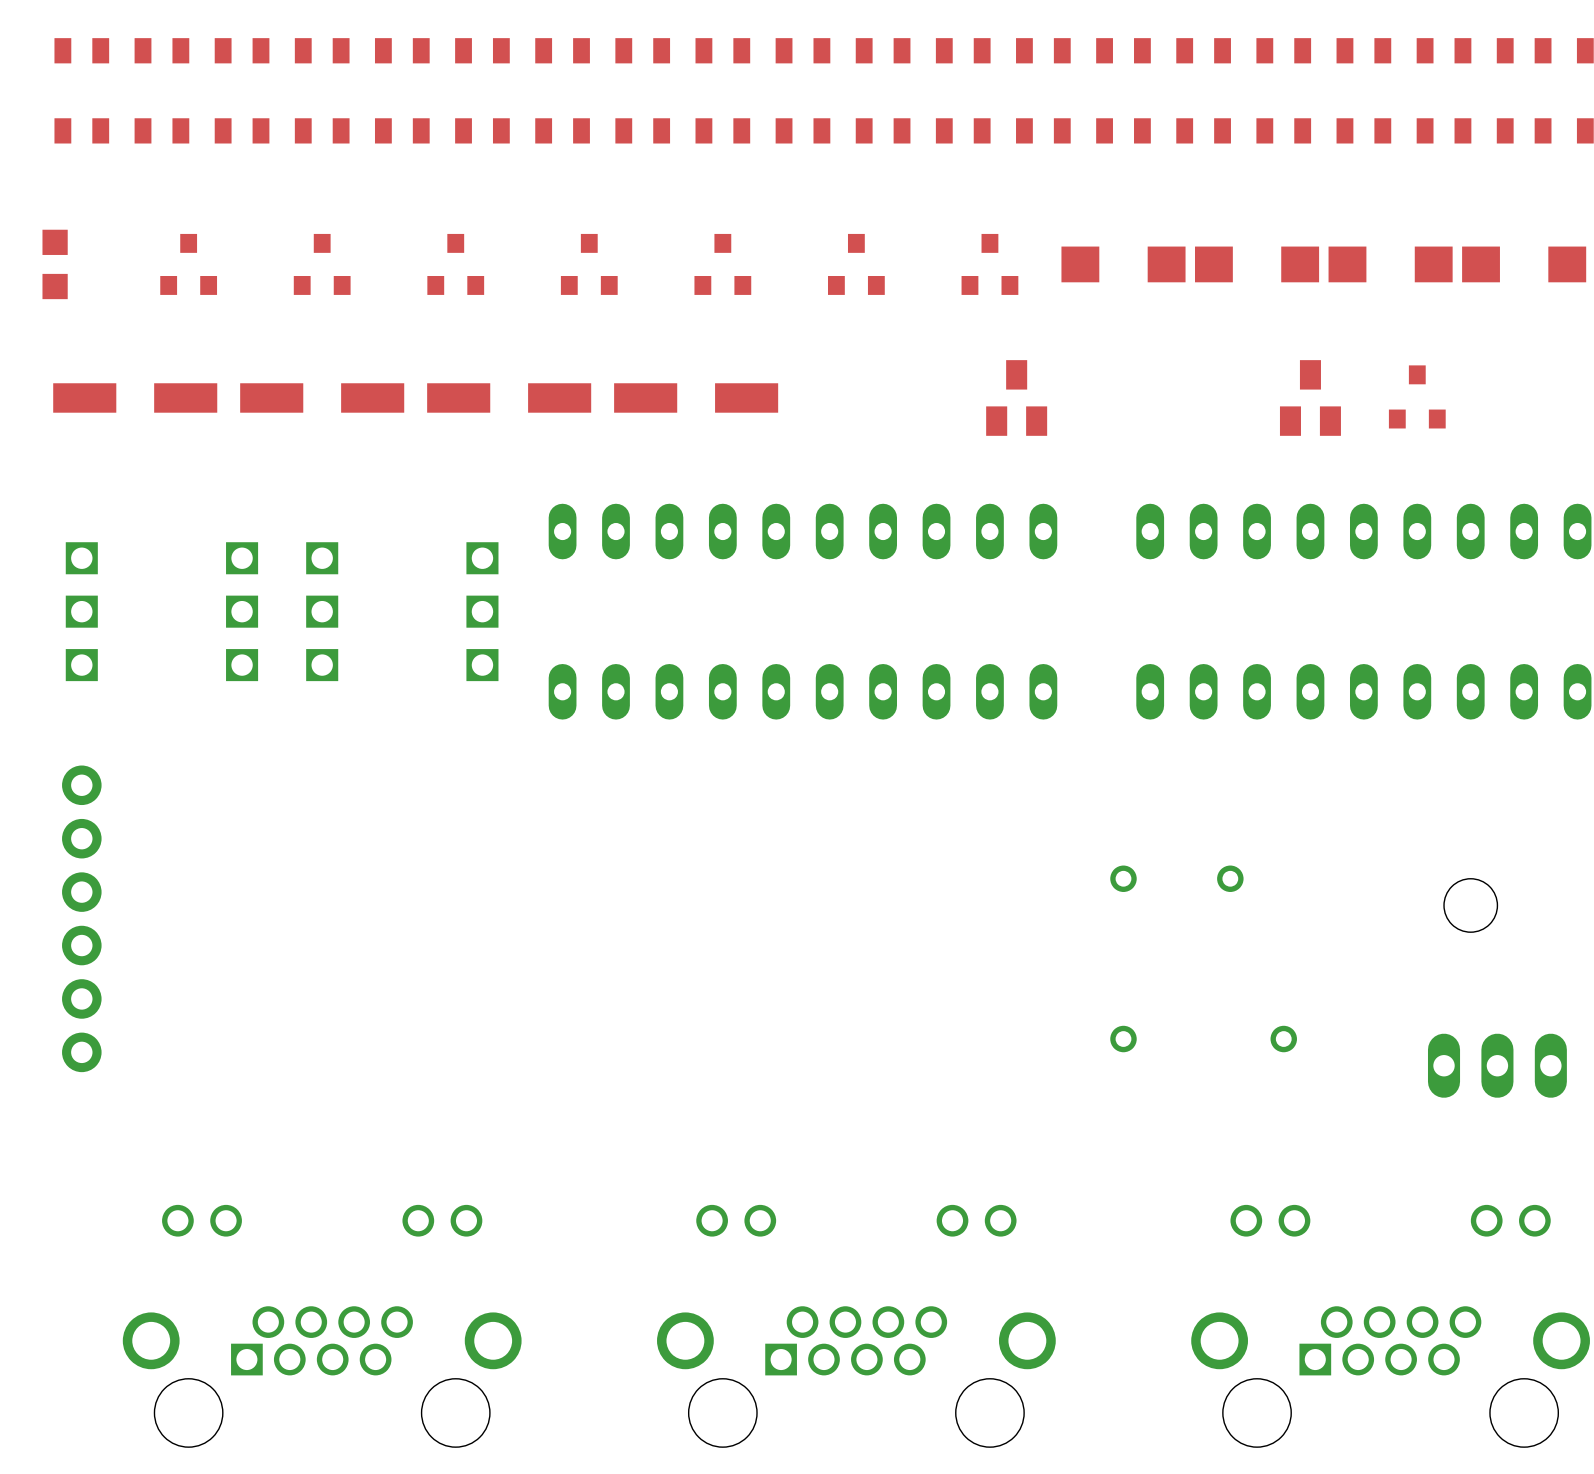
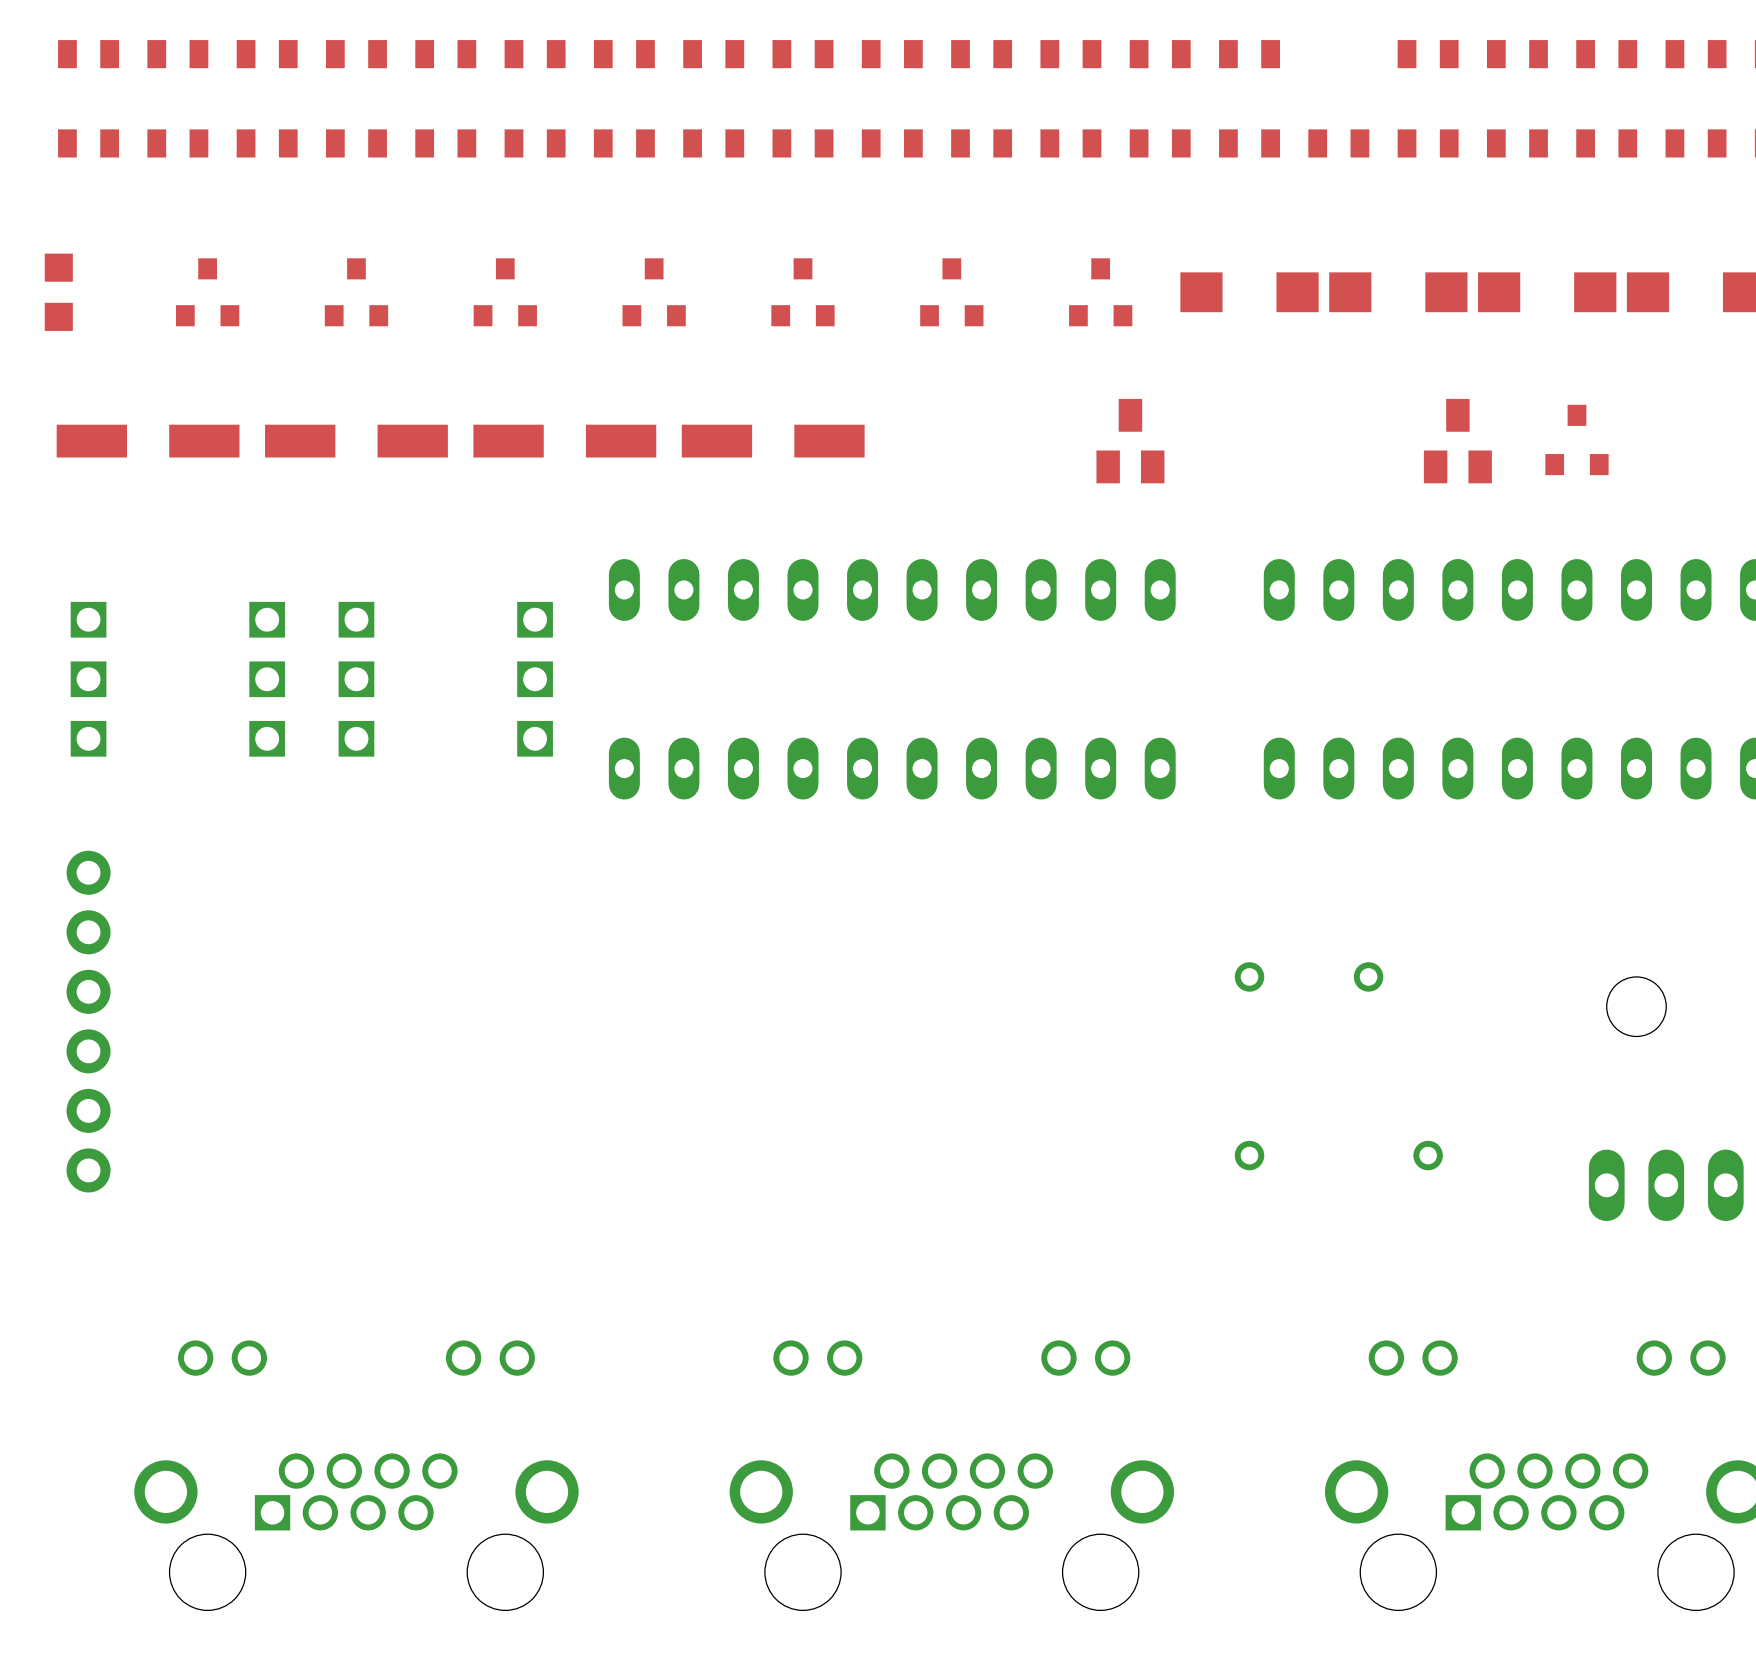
part: (1203, 50) -> none

